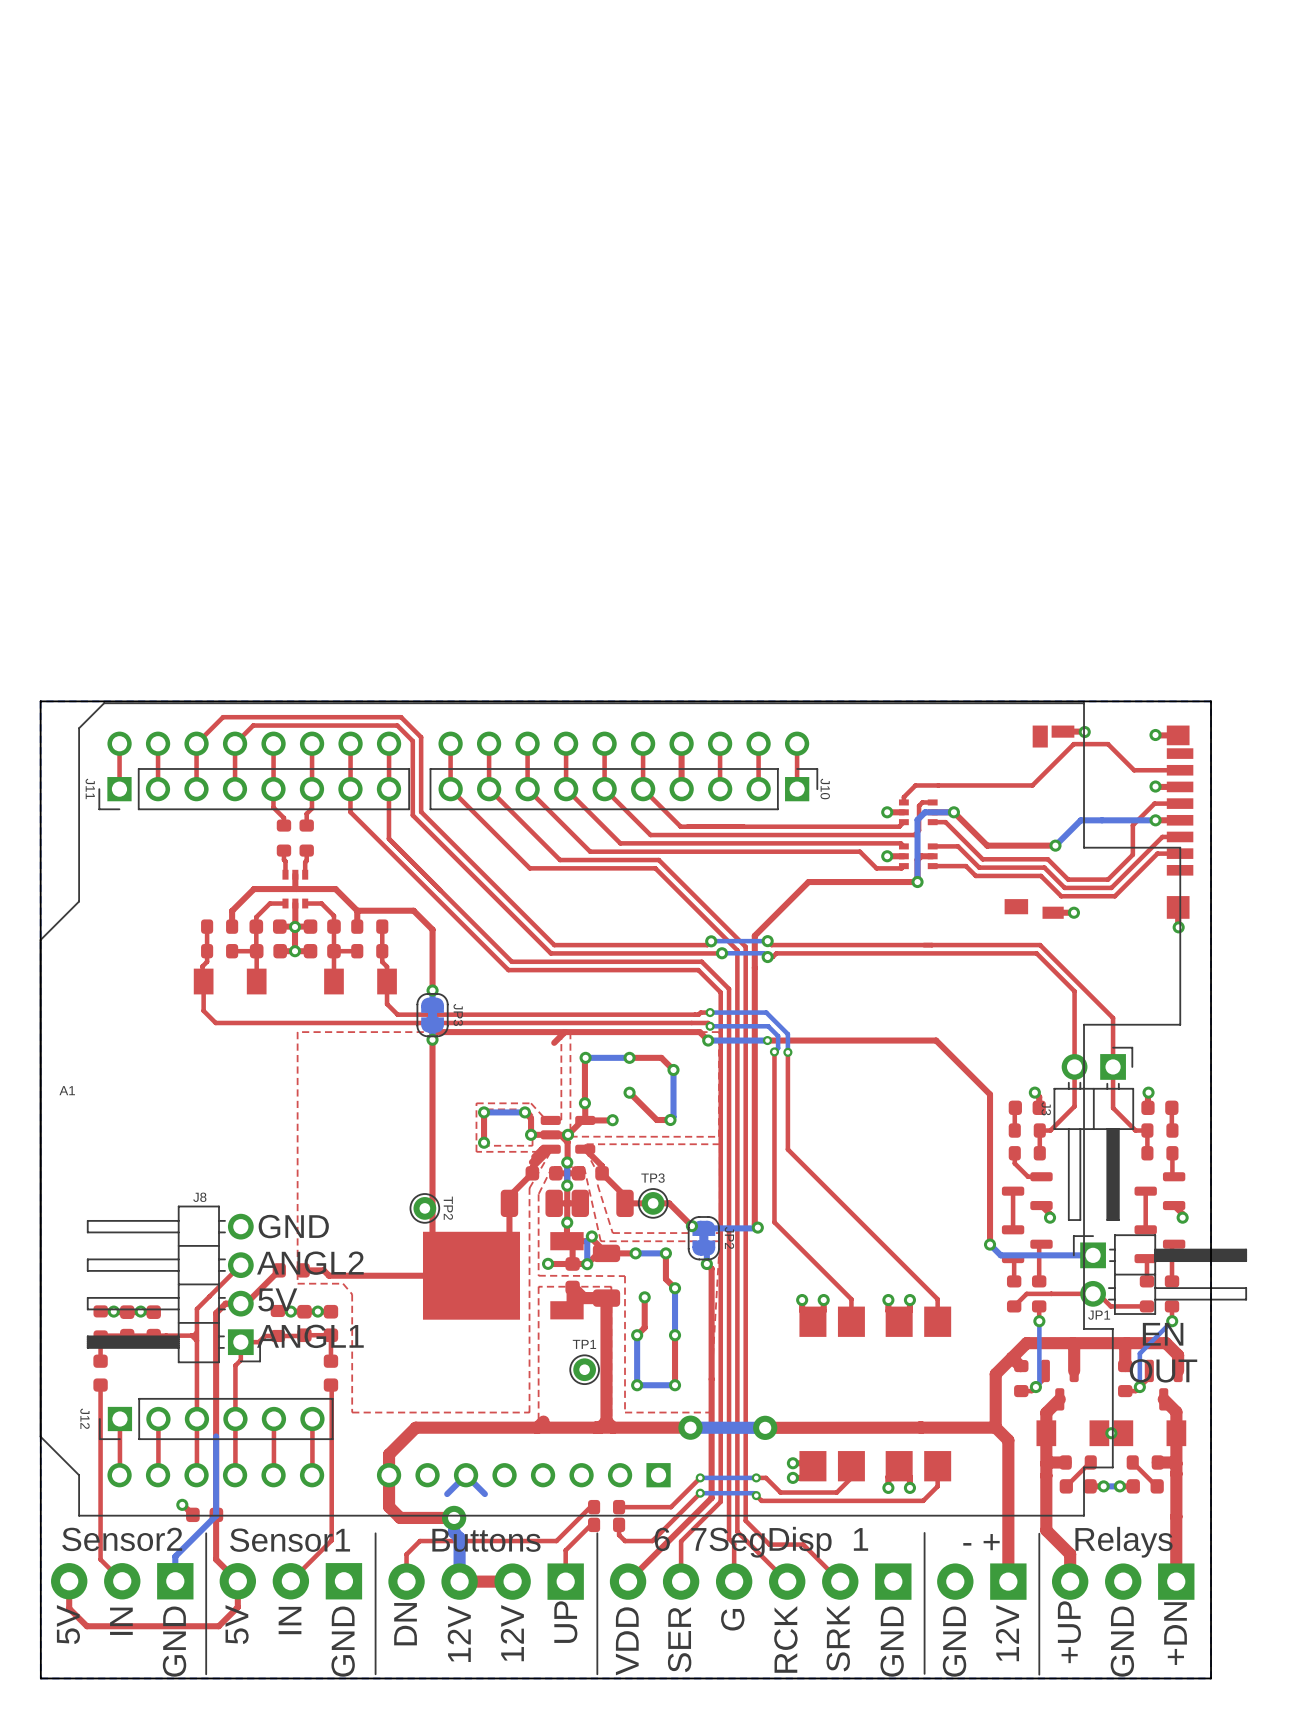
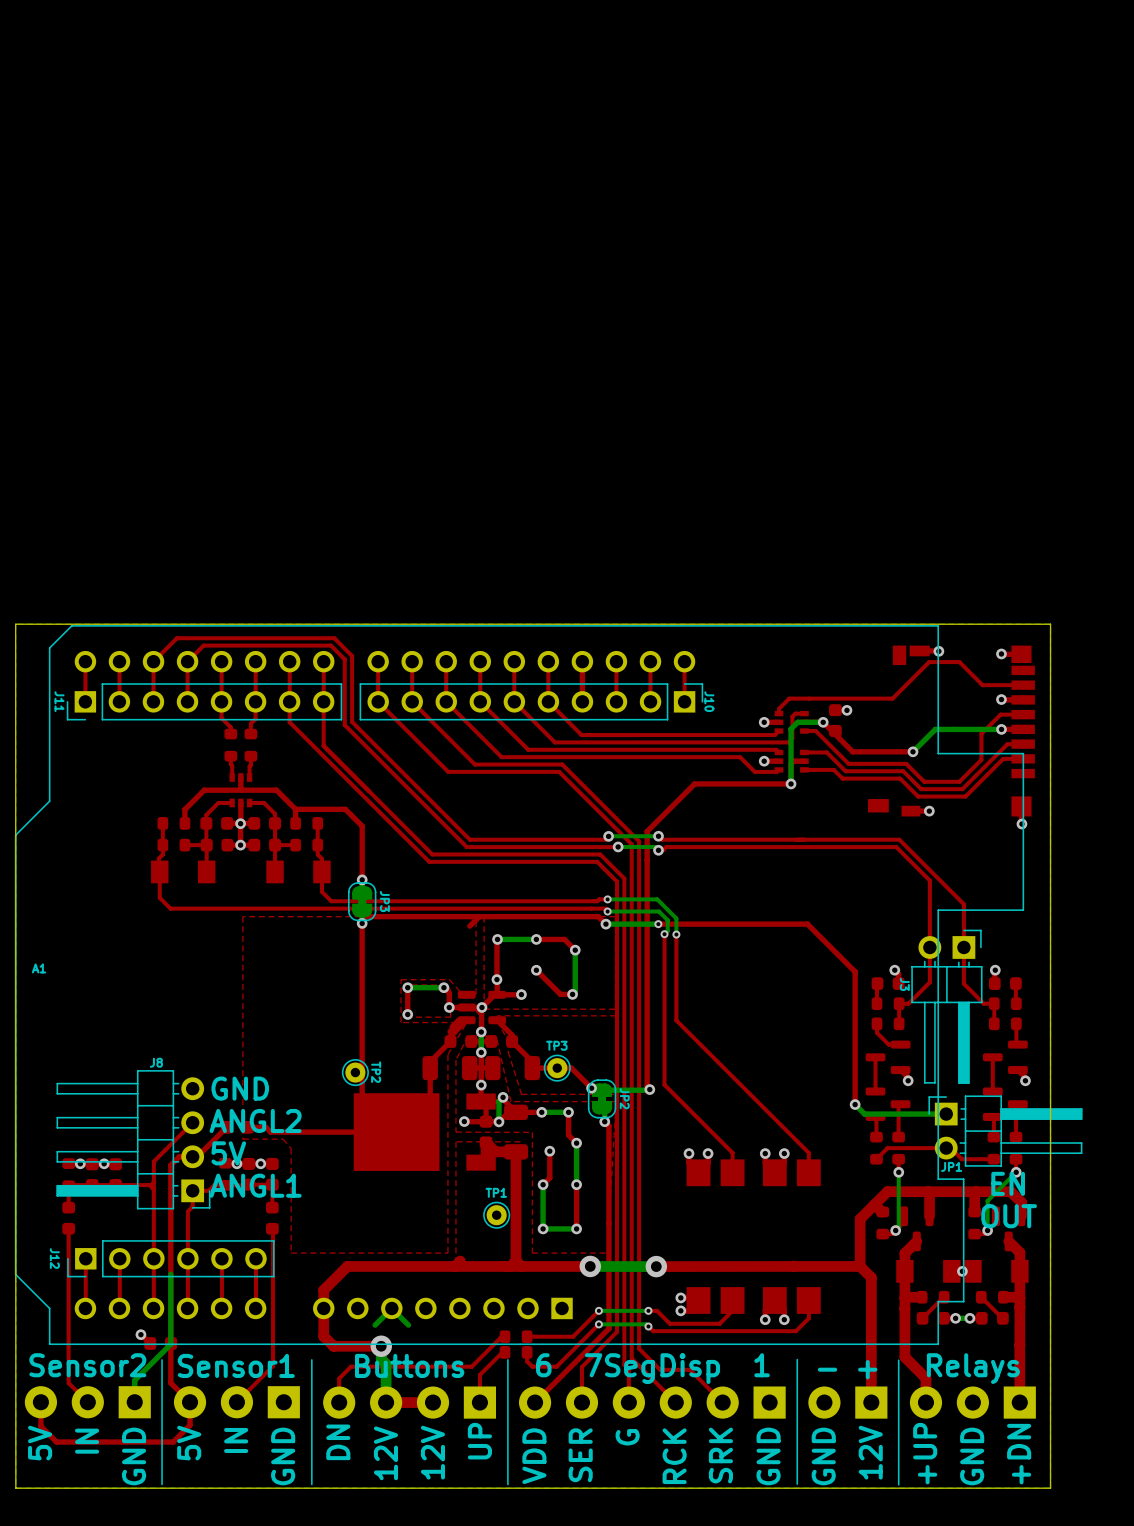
via: none -> (846, 710)
part: none -> (835, 720)

